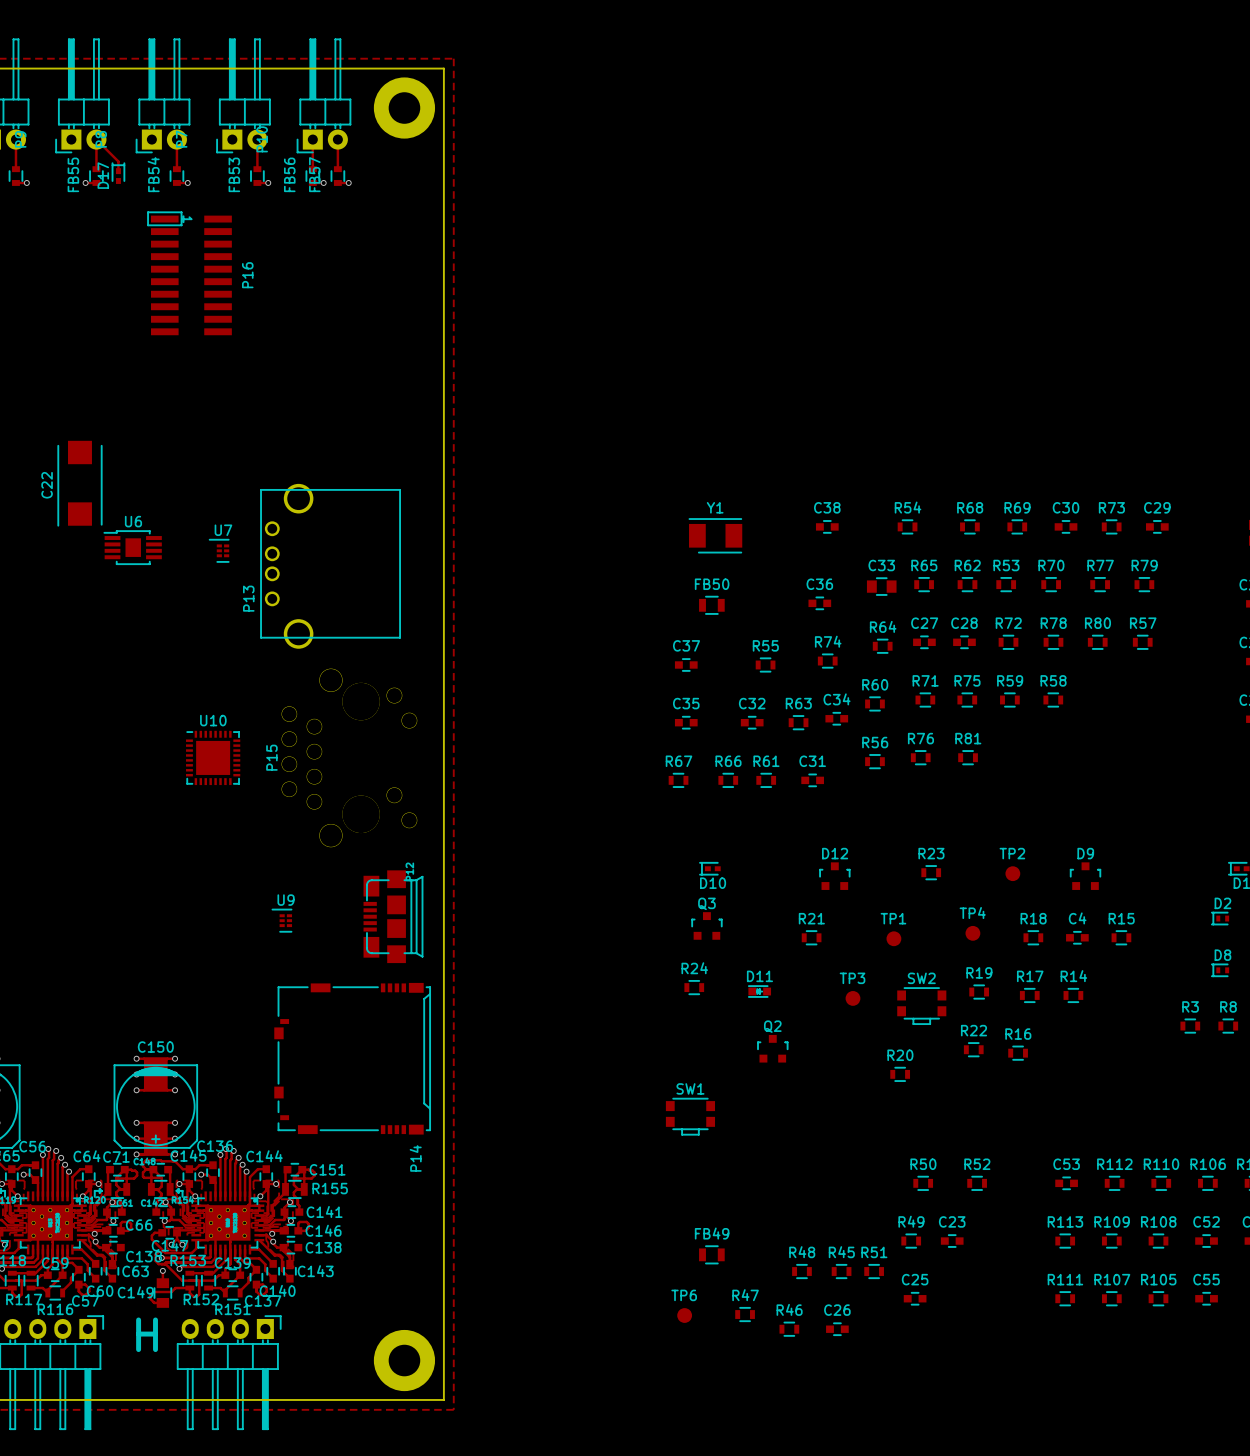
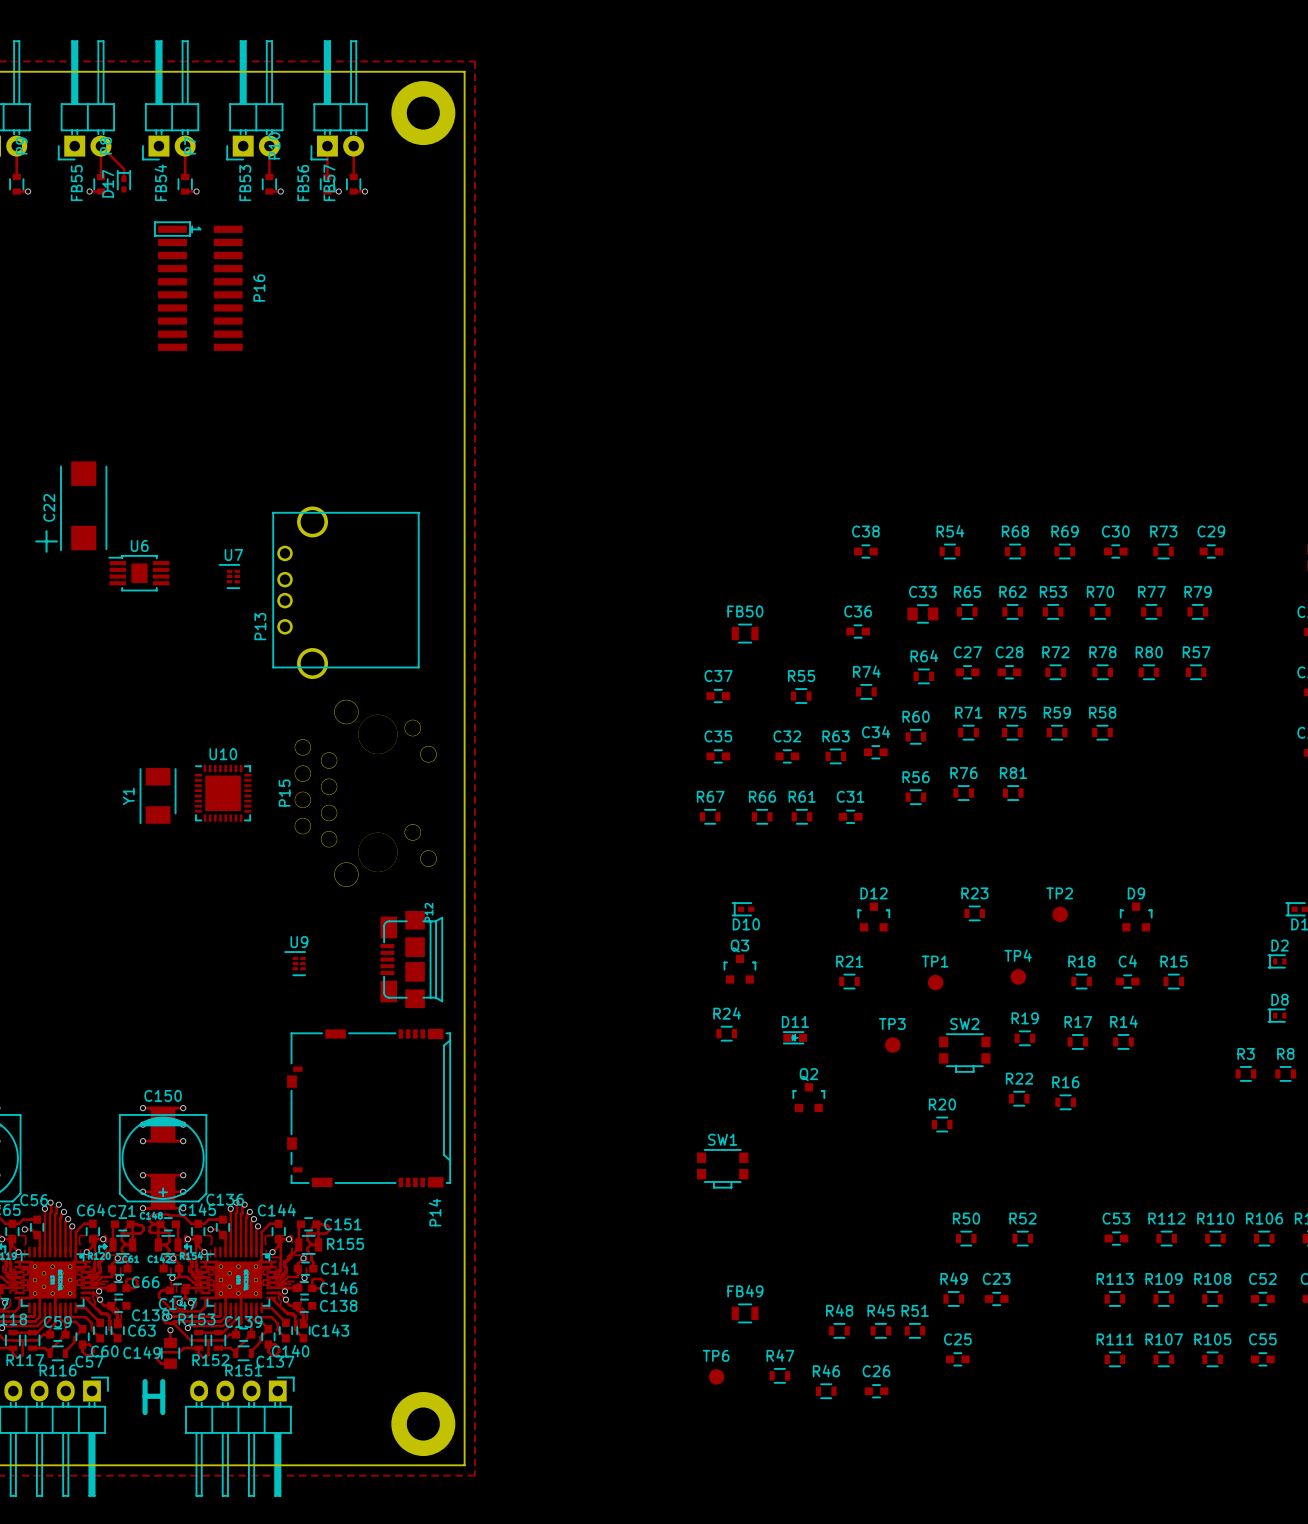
line: none -> (46, 531) (46, 551)
line: none -> (36, 541) (56, 541)
Y1 rotation: 0° (715, 535) -> 90° counterclockwise (158, 796)
Y1 position: (715, 535) -> (158, 796)

